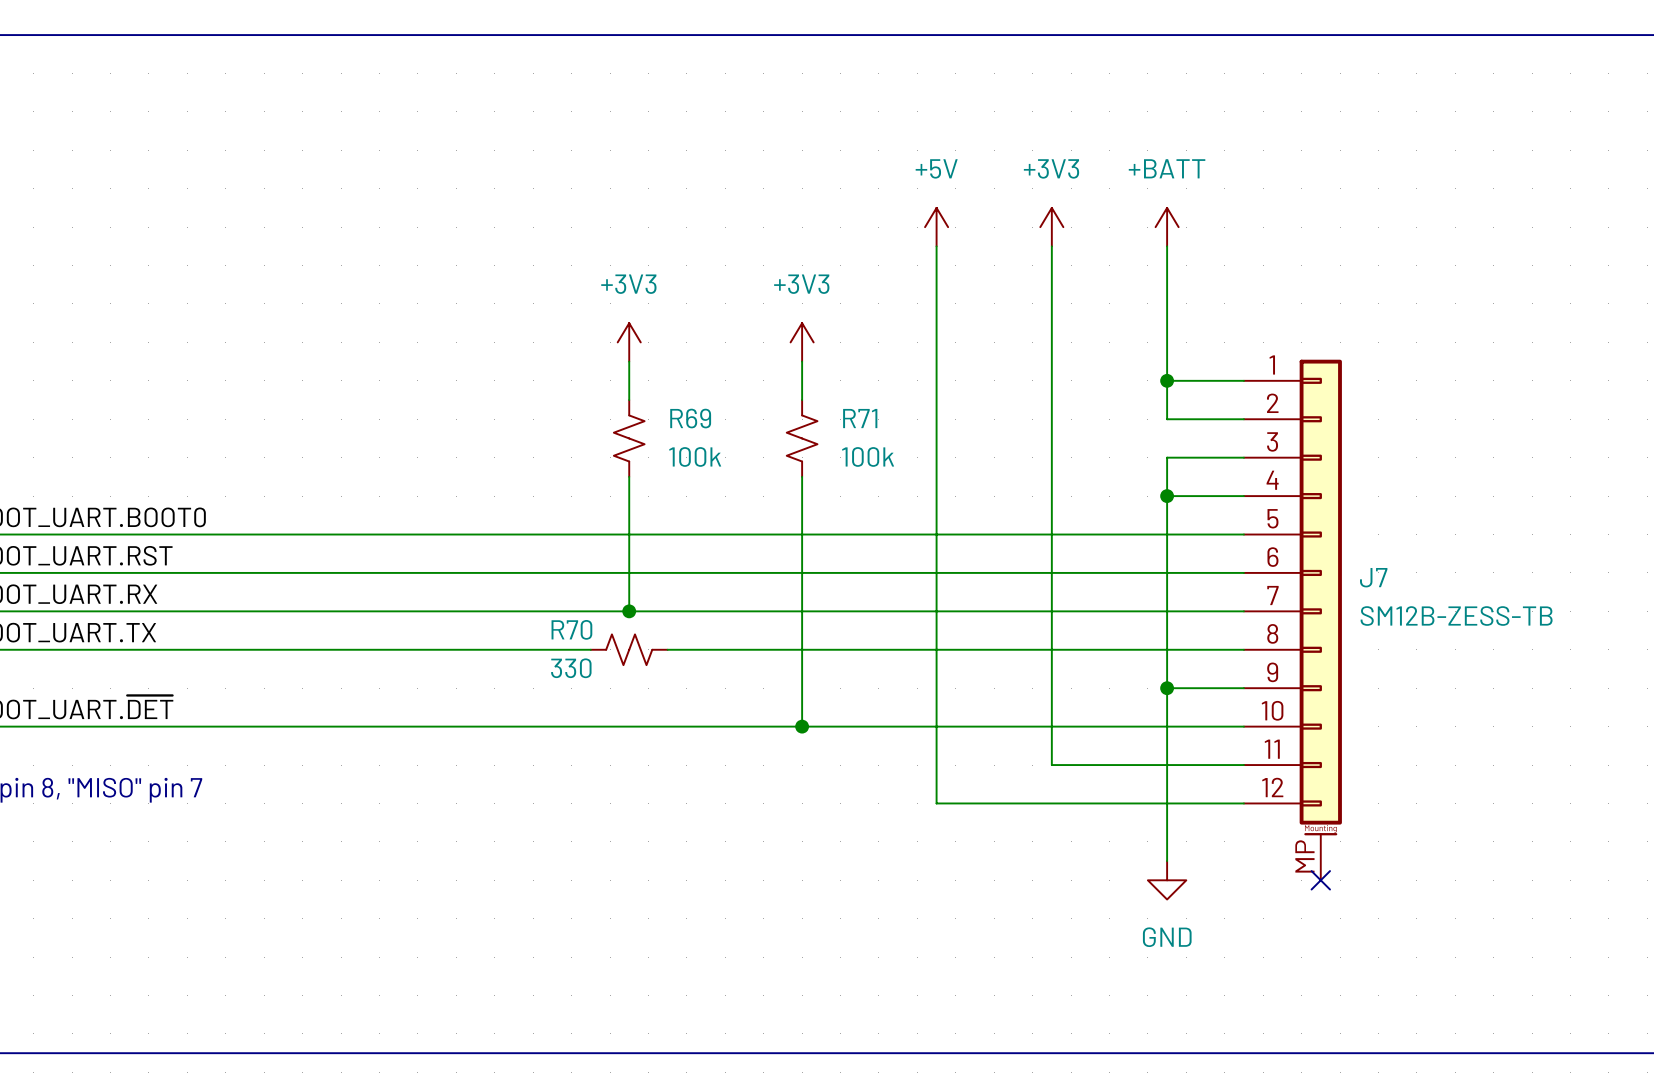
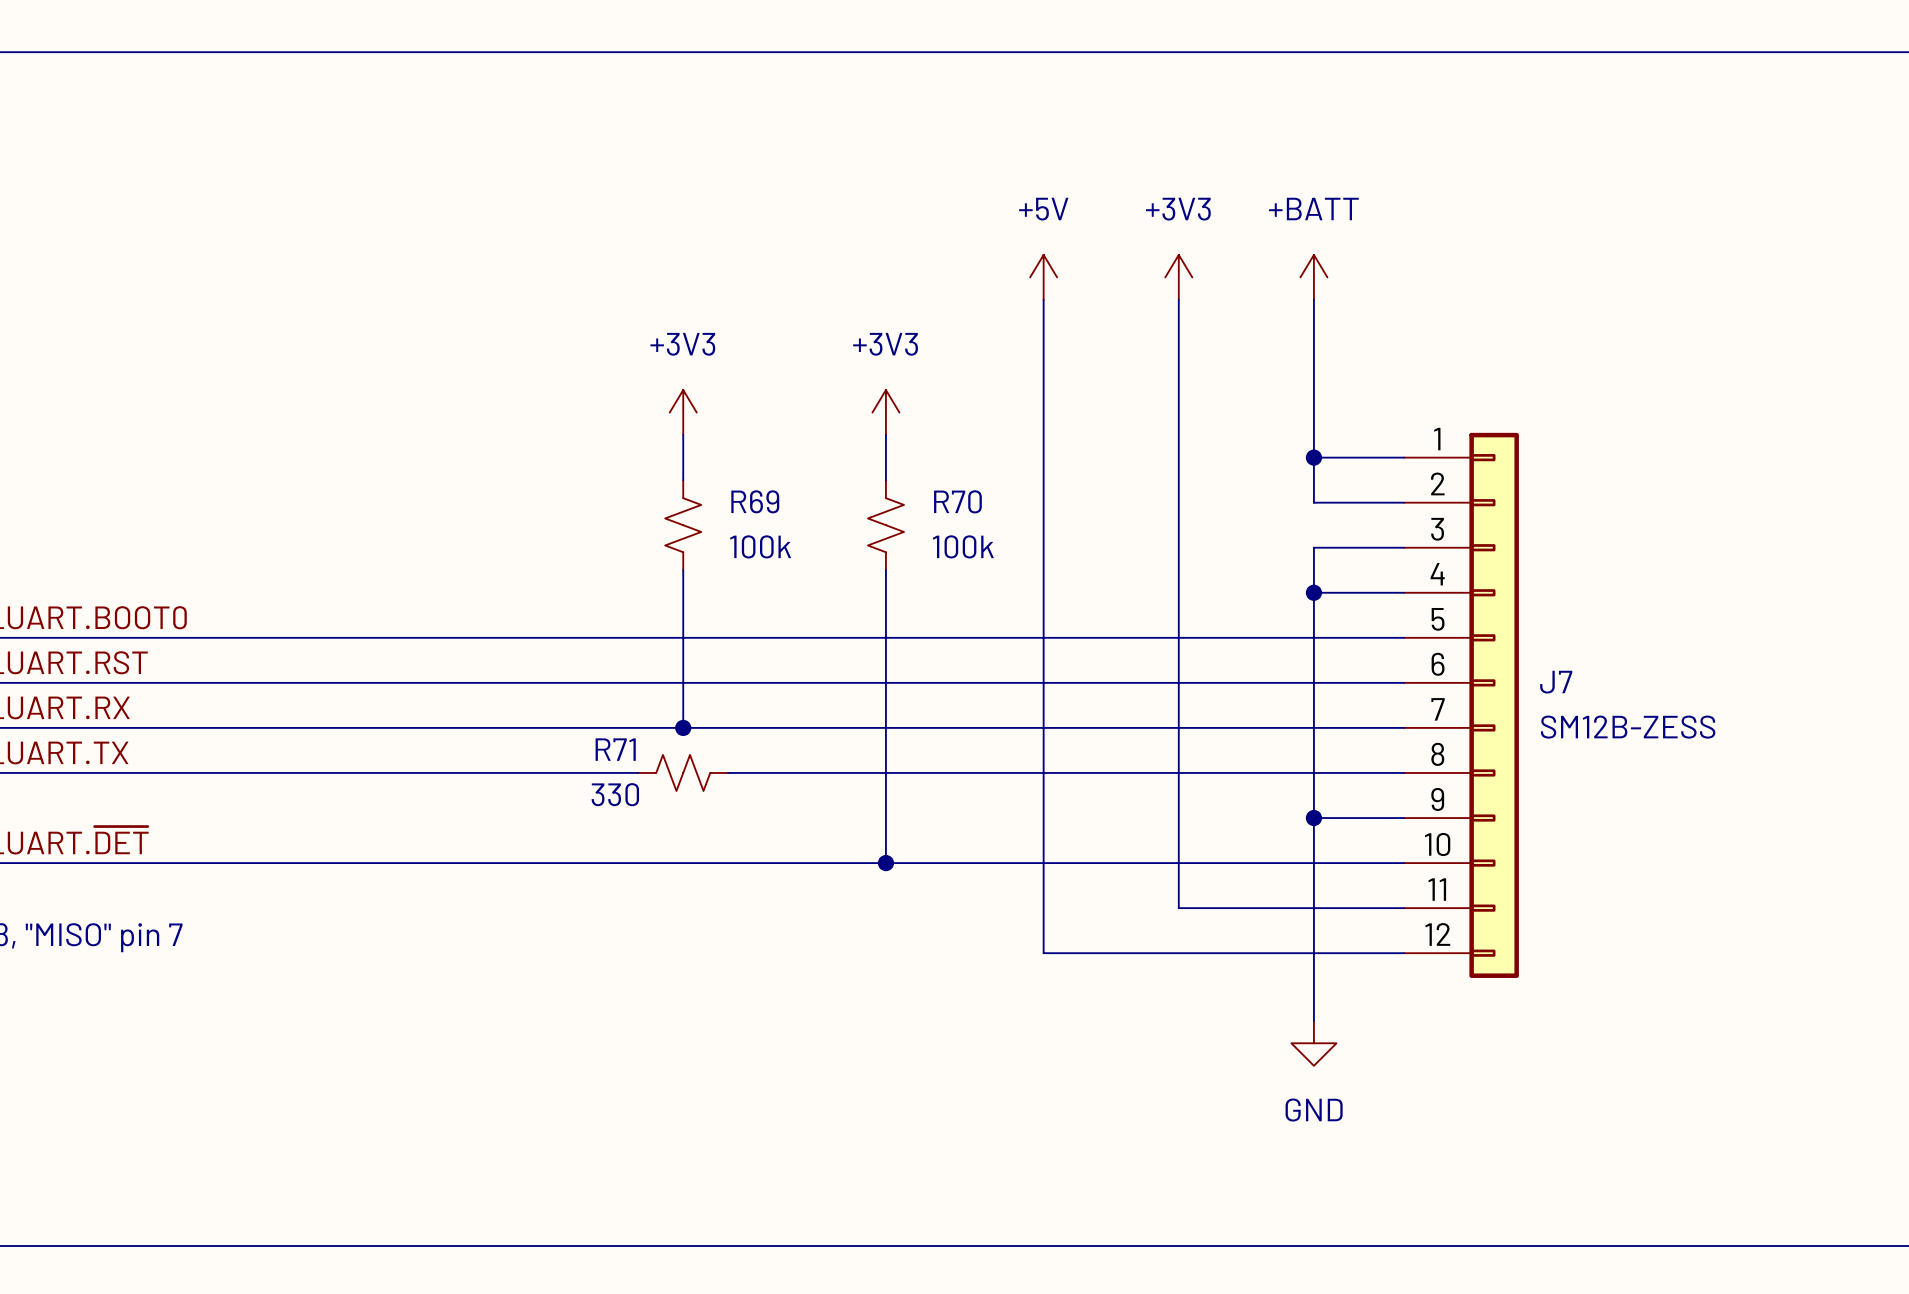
J7 symbol: [1243, 359, 1342, 881] -> [1404, 432, 1519, 978]
R71 name: R71 (860, 418) -> R70 (957, 501)
J7 value: SM12B-ZESS-TB (1456, 616) -> SM12B-ZESS (1628, 727)
R70 name: R70 (571, 629) -> R71 (615, 749)
no-connect mark: (1320, 880) -> none

